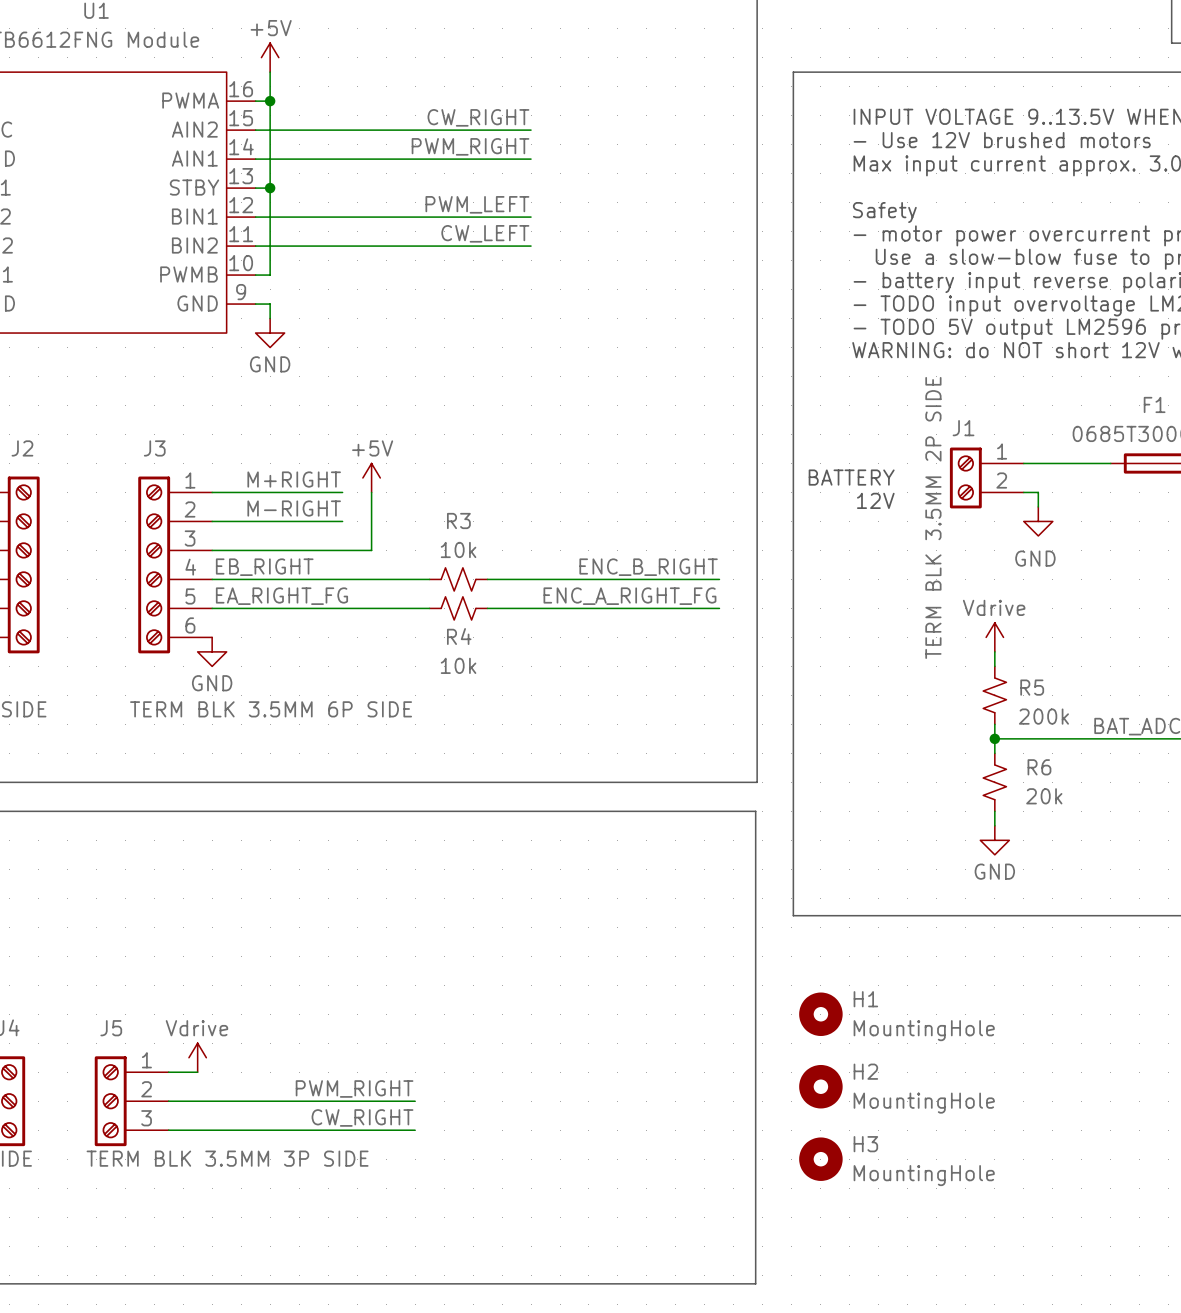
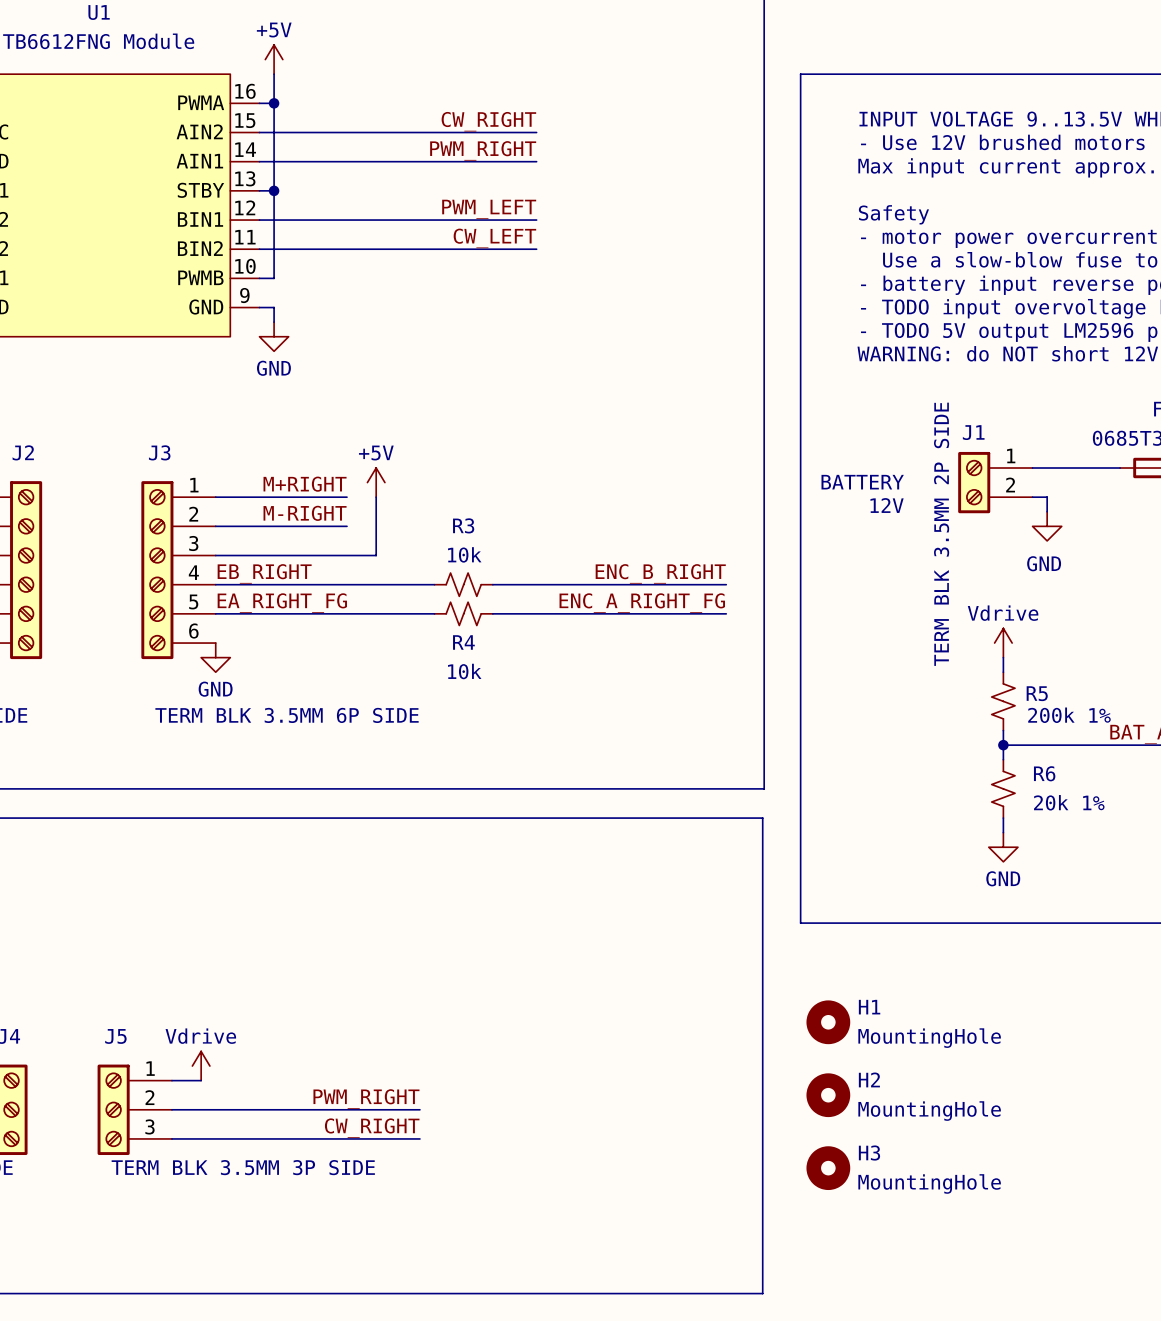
R5 value: 200k (1043, 716) -> 200k 1% (1069, 715)
R6 value: 20k (1044, 796) -> 20k 1% (1069, 802)

